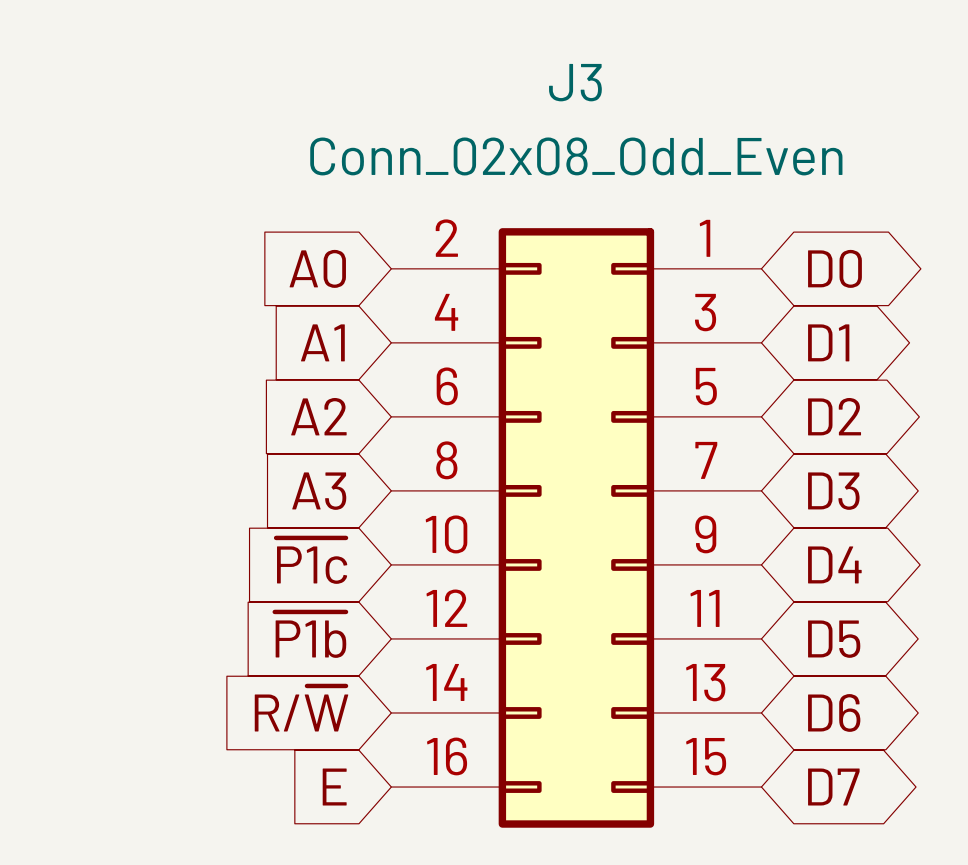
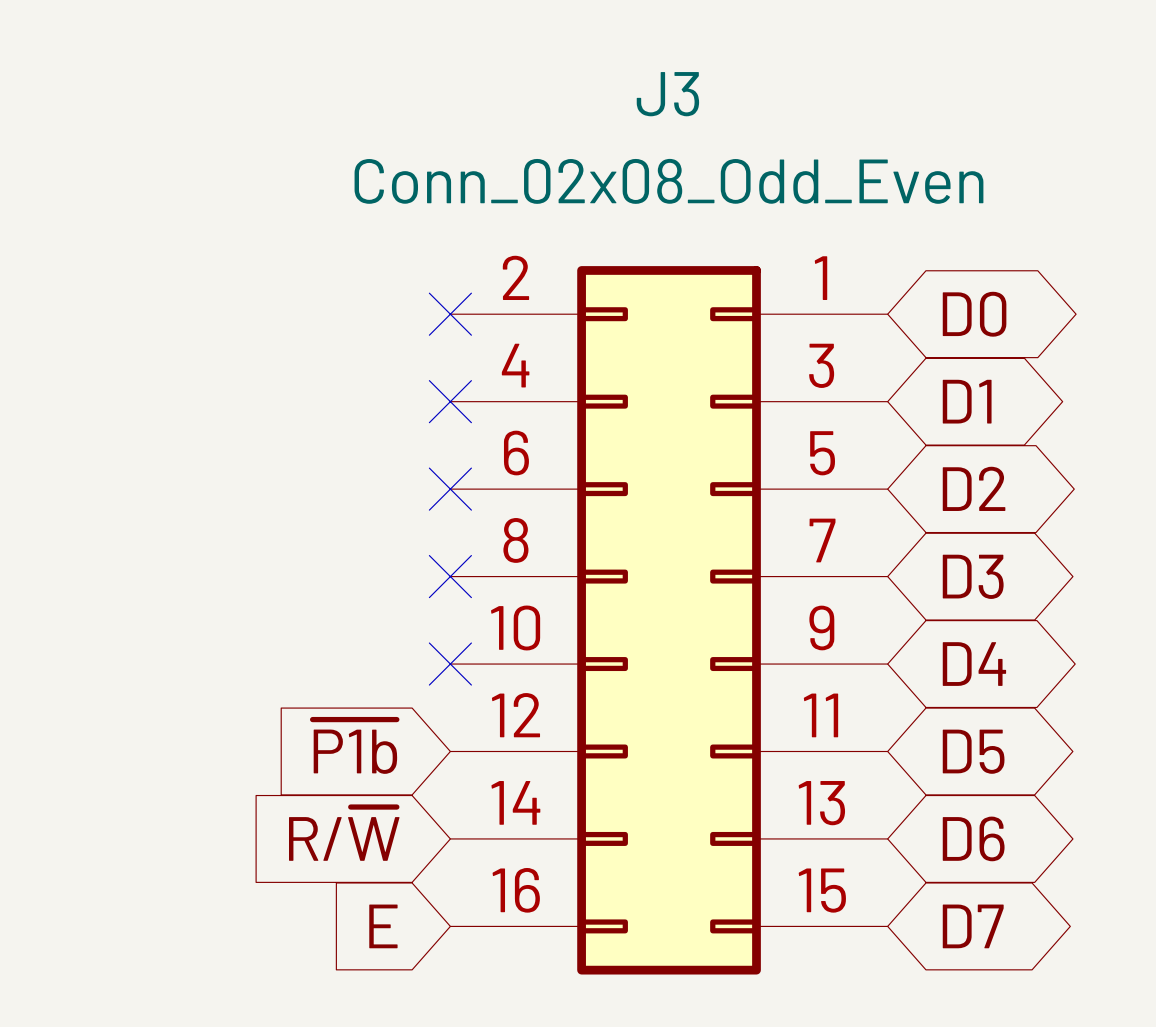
global label: A0 (317, 268) -> none
no-connect mark: none -> (450, 314)
global label: A1 (322, 342) -> none
no-connect mark: none -> (450, 401)
global label: A2 (318, 416) -> none
no-connect mark: none -> (450, 489)
no-connect mark: none -> (450, 576)
global label: A3 (319, 491) -> none
global label: ~{P1c} (311, 560) -> none
no-connect mark: none -> (450, 664)

